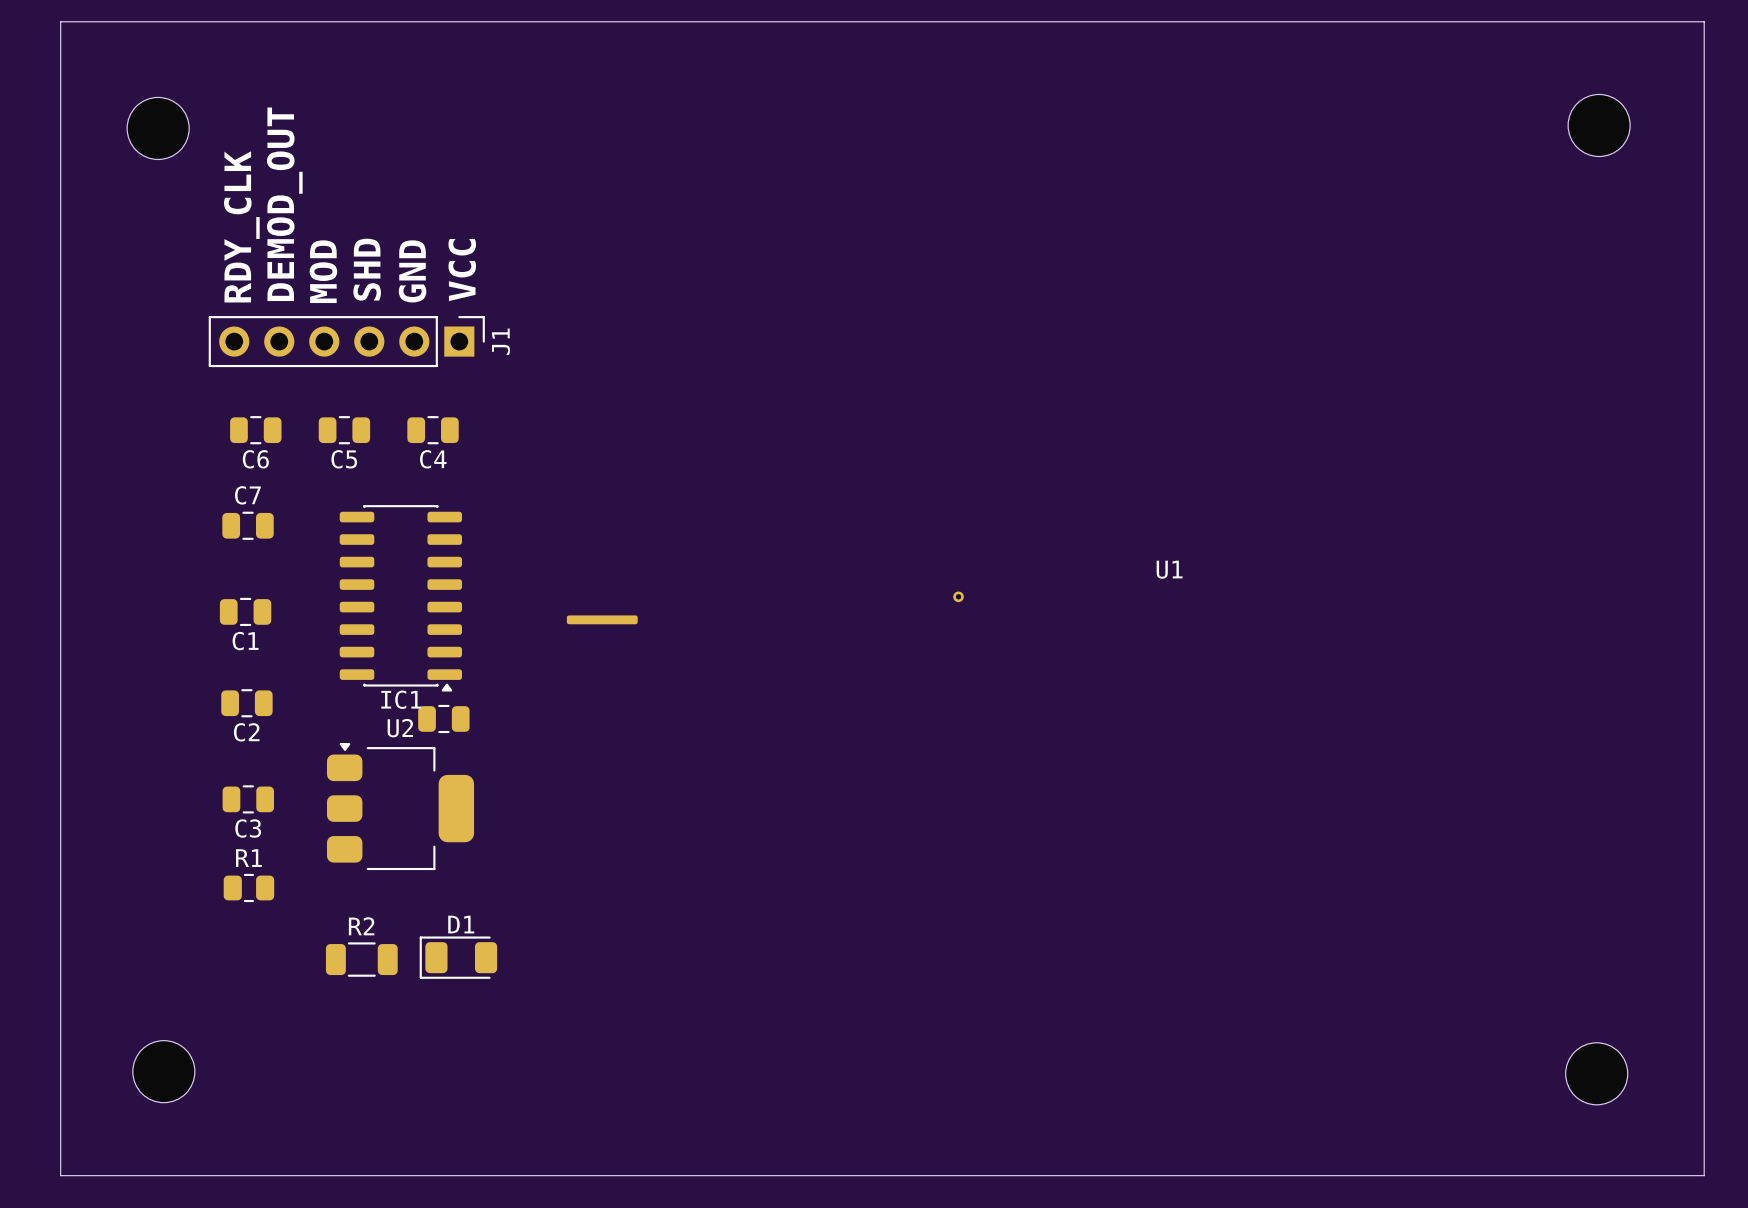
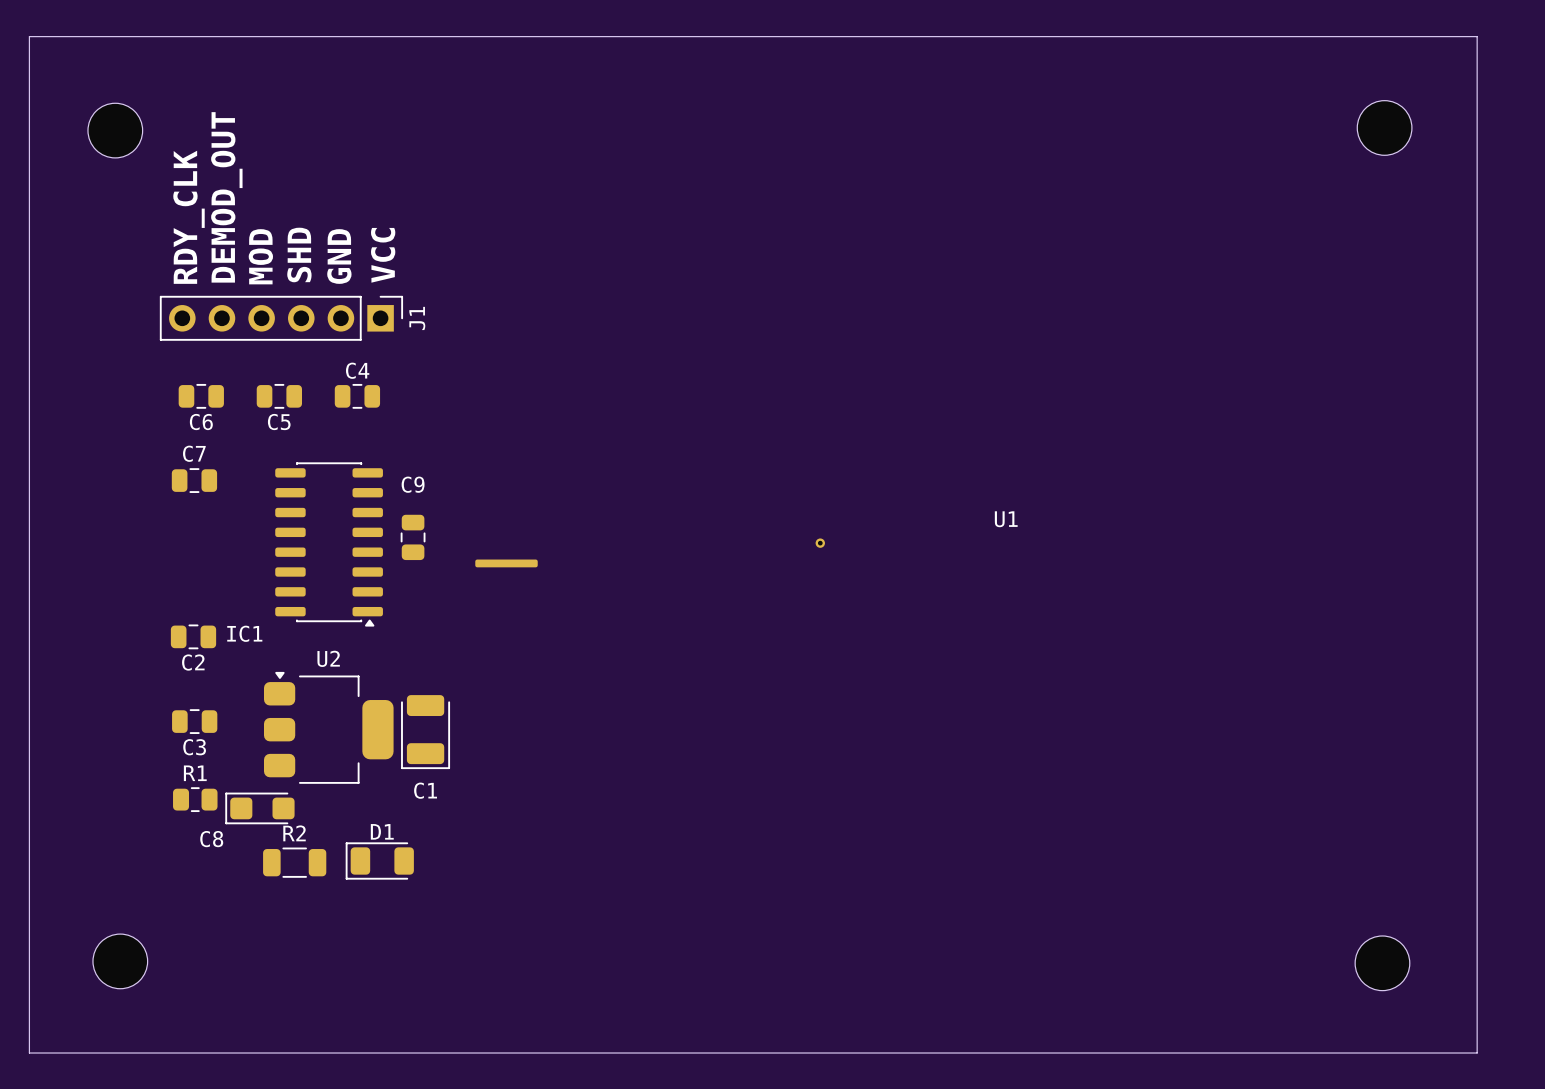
C4 name position: C4 (433, 459) -> C4 (357, 370)
C9: none -> (413, 537)
C1 footprint: [219, 597, 272, 627] -> [401, 695, 451, 770]
C1 name position: C1 (245, 641) -> C1 (425, 790)
IC1 name position: IC1 (401, 699) -> IC1 (244, 633)
part: (443, 718) -> none
C8: none -> (259, 808)

